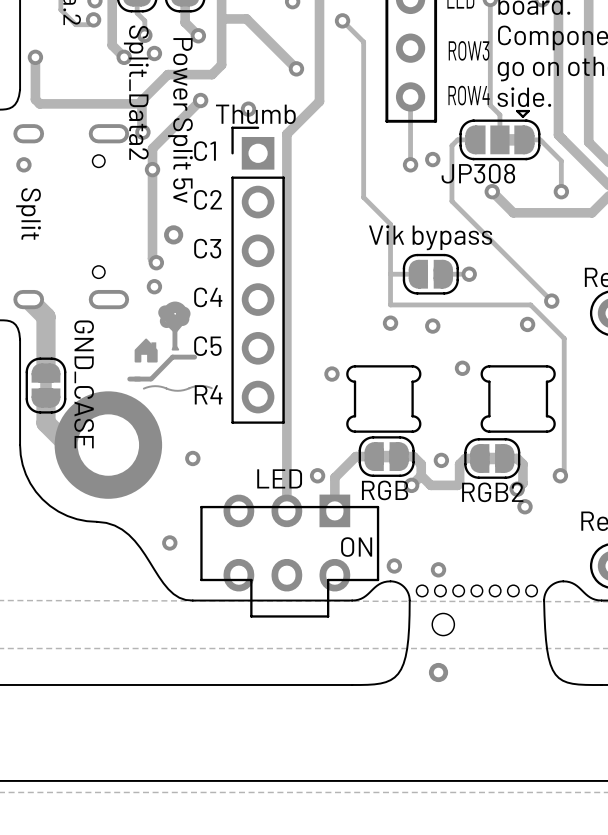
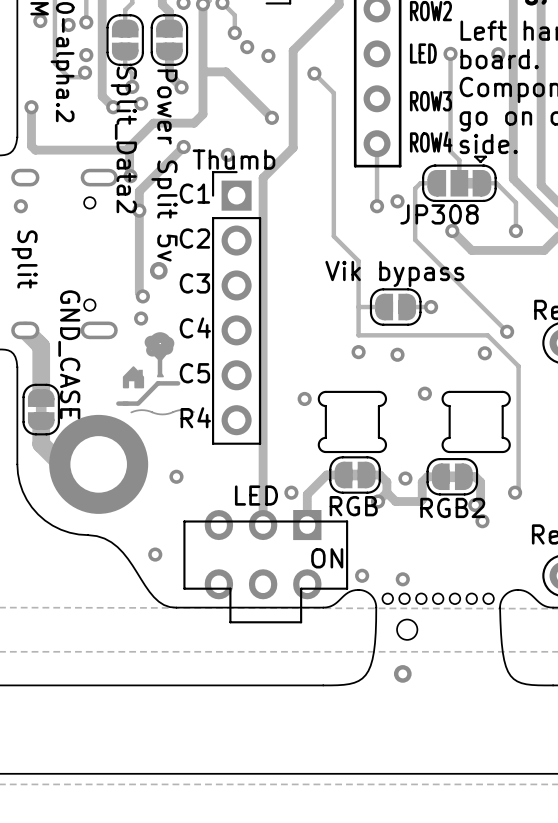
part value position: GND_CASE (84, 384) -> GND_CASE (69, 354)

